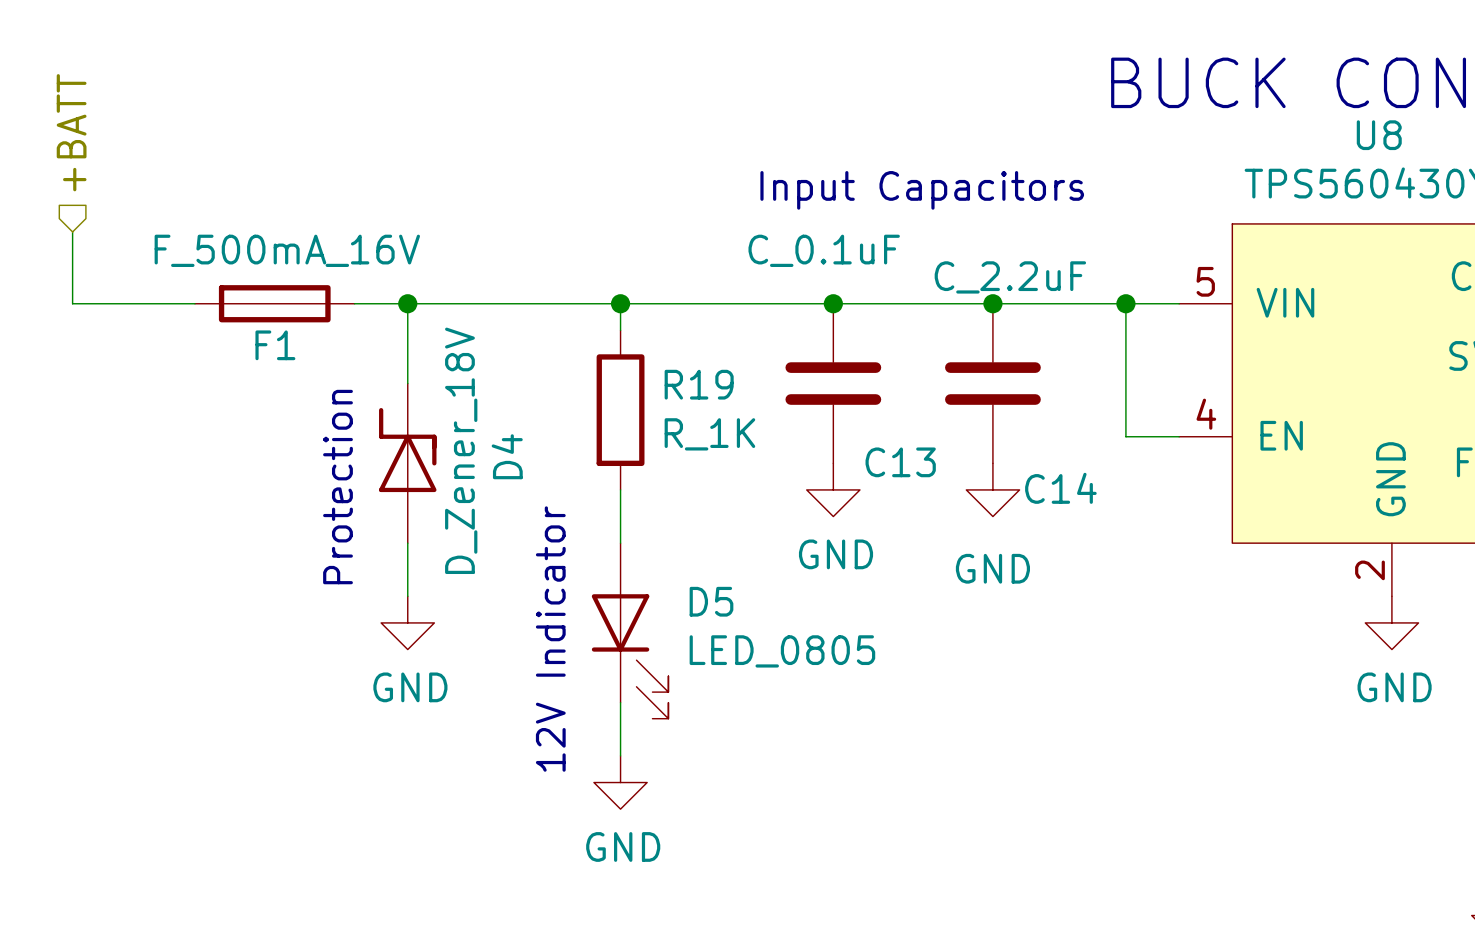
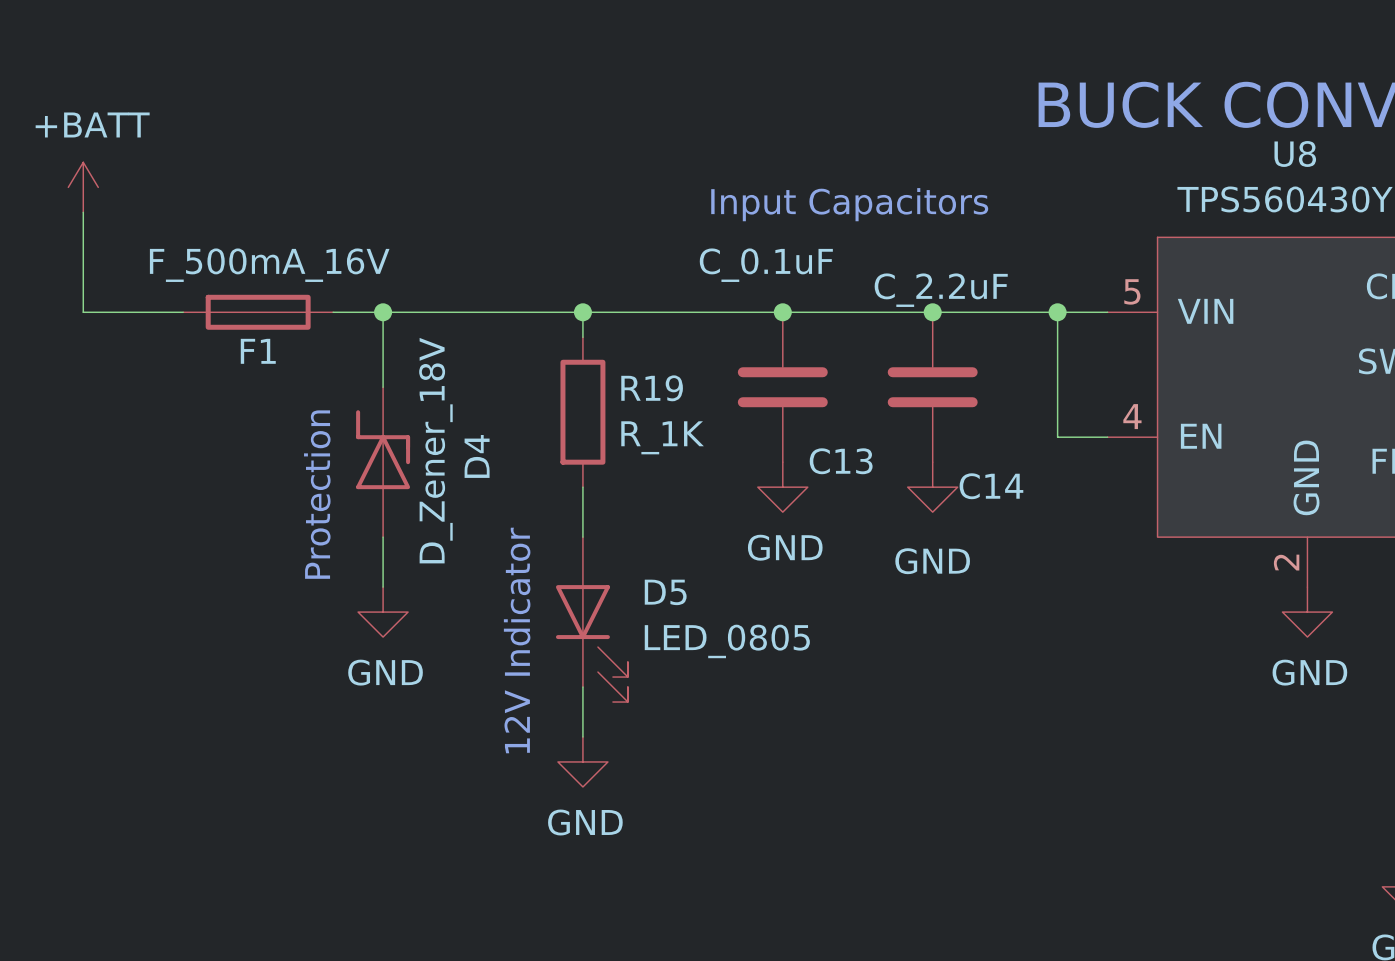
hierarchical label: +BATT (71, 132) -> none
power symbol: none -> +BATT (83, 187)
wire: (72, 231) (72, 303) (88, 303) -> (83, 212) (83, 312)

